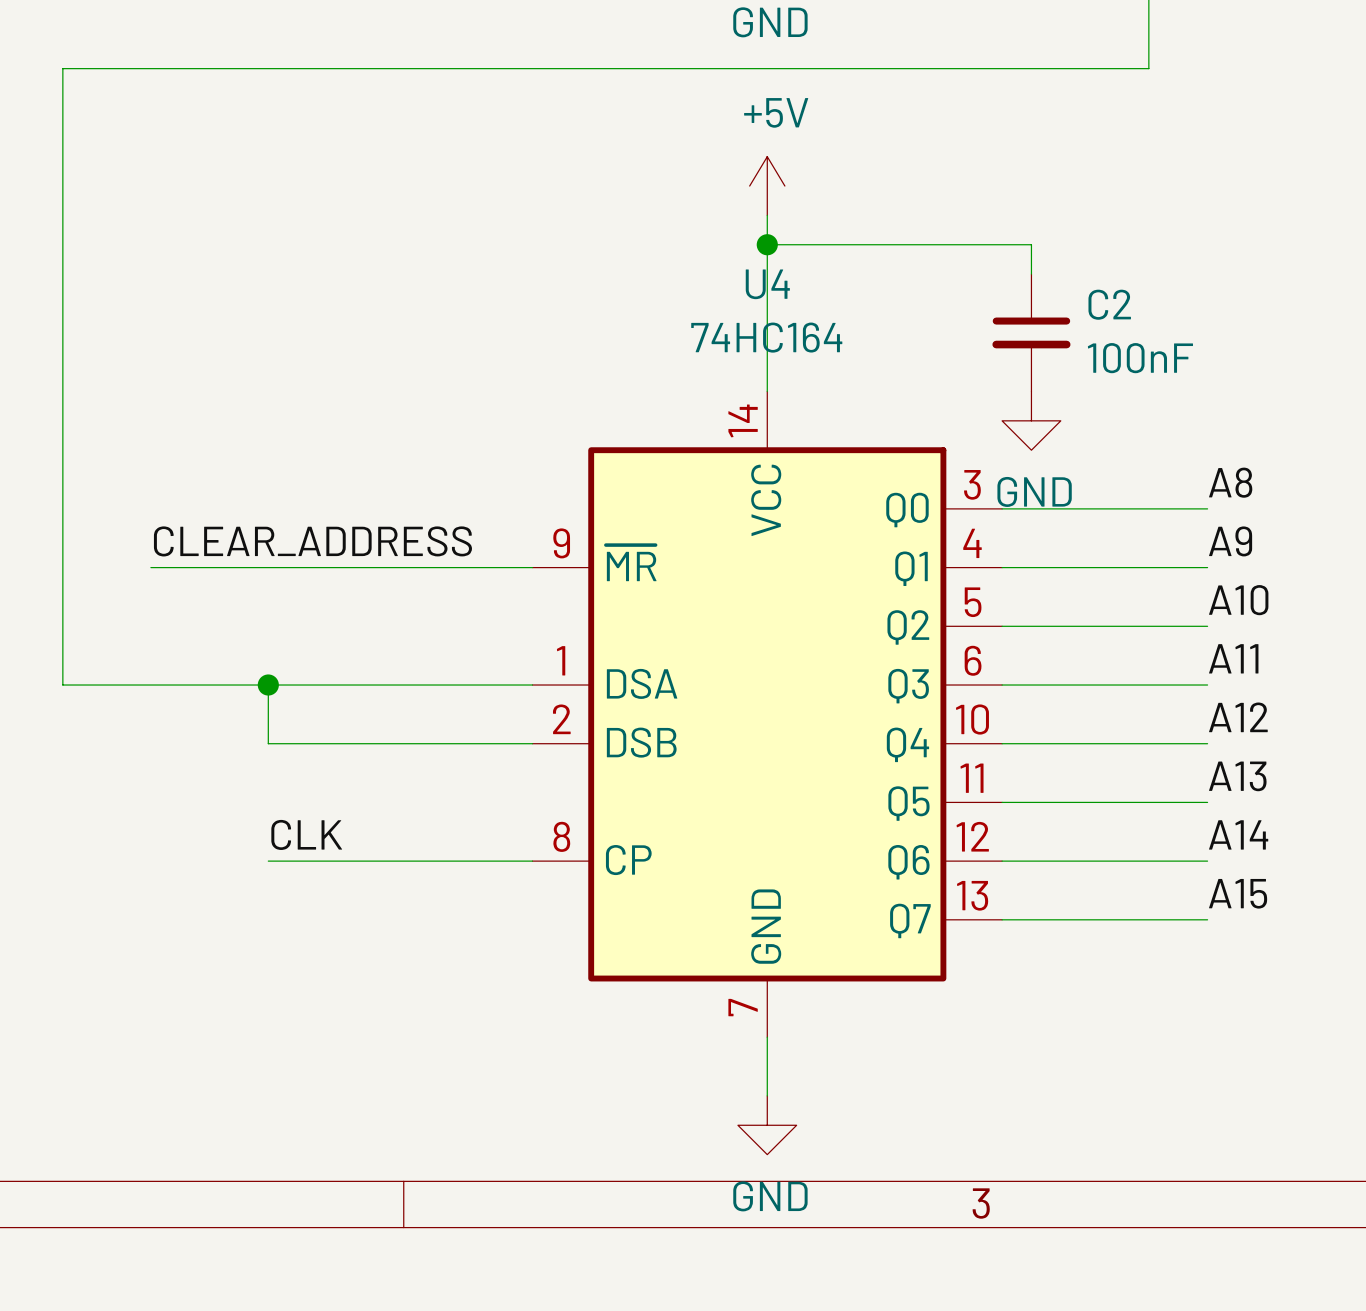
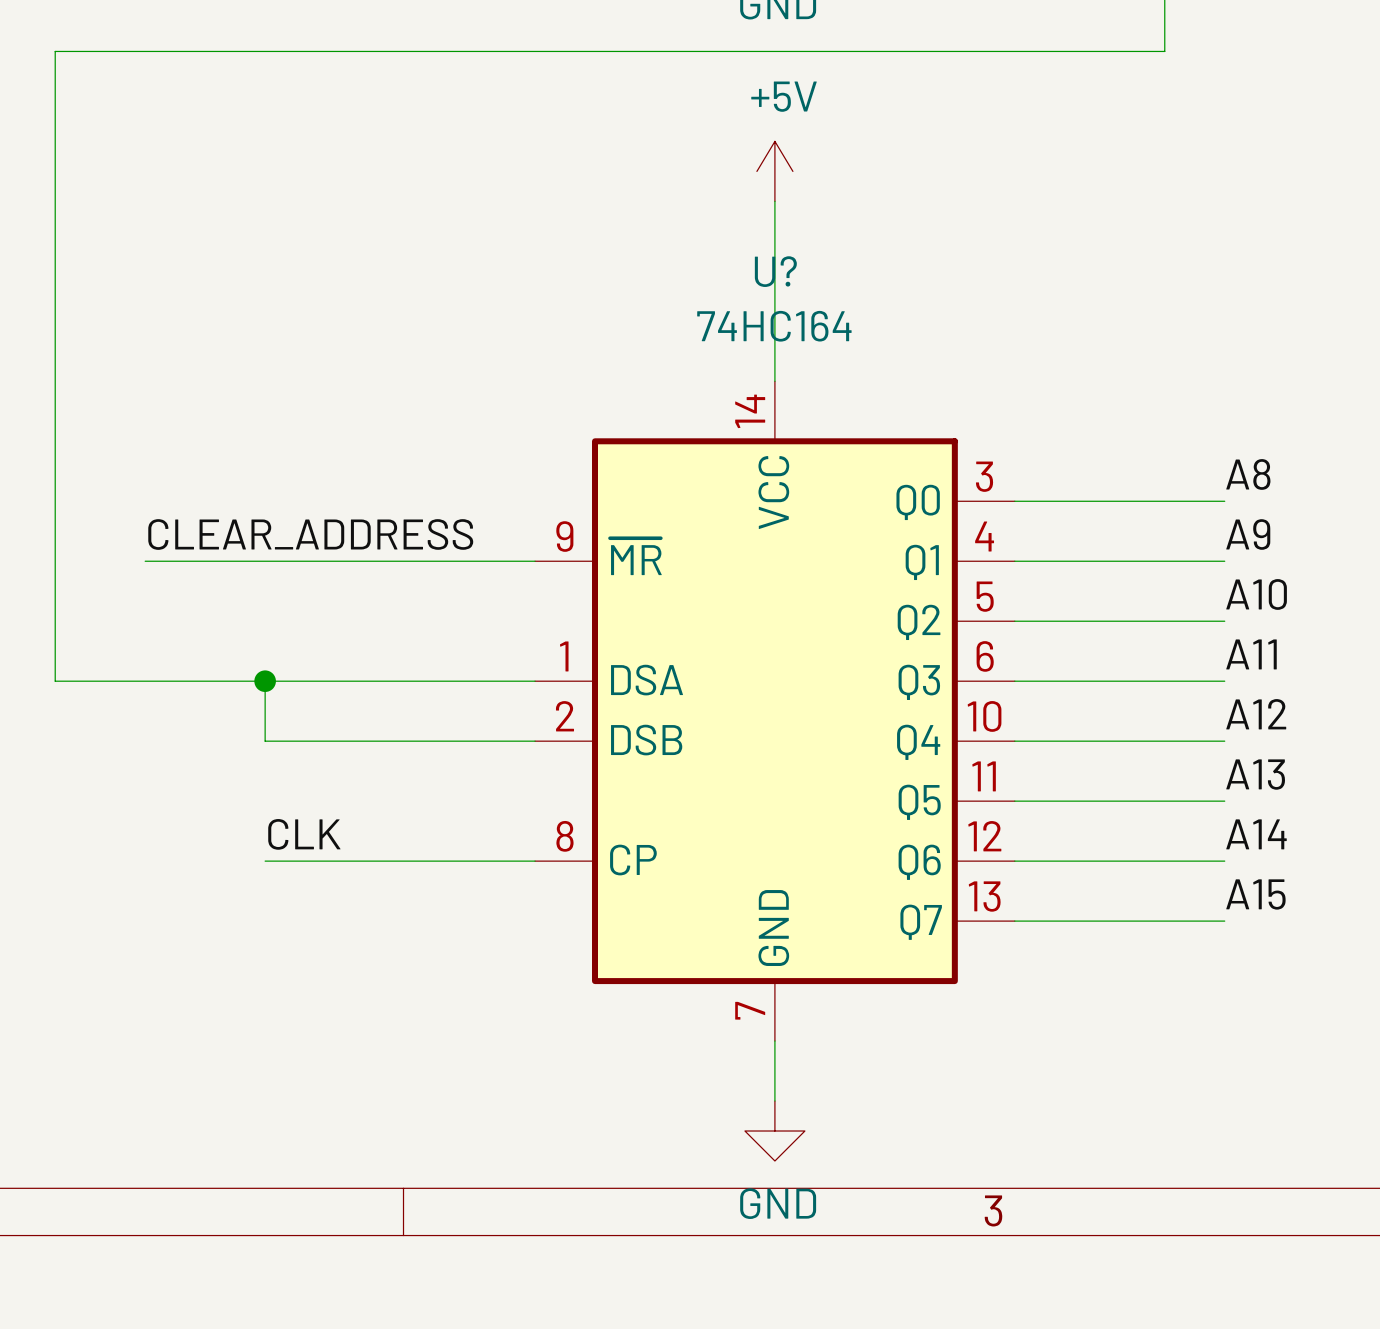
wire: (767, 244) (1031, 244) (1031, 274) -> none
junction: (767, 244) -> none
U4 name: U4 (767, 284) -> U? (775, 271)
C2: 100nF (1031, 332) -> none
power symbol: GND (1031, 420) -> none

